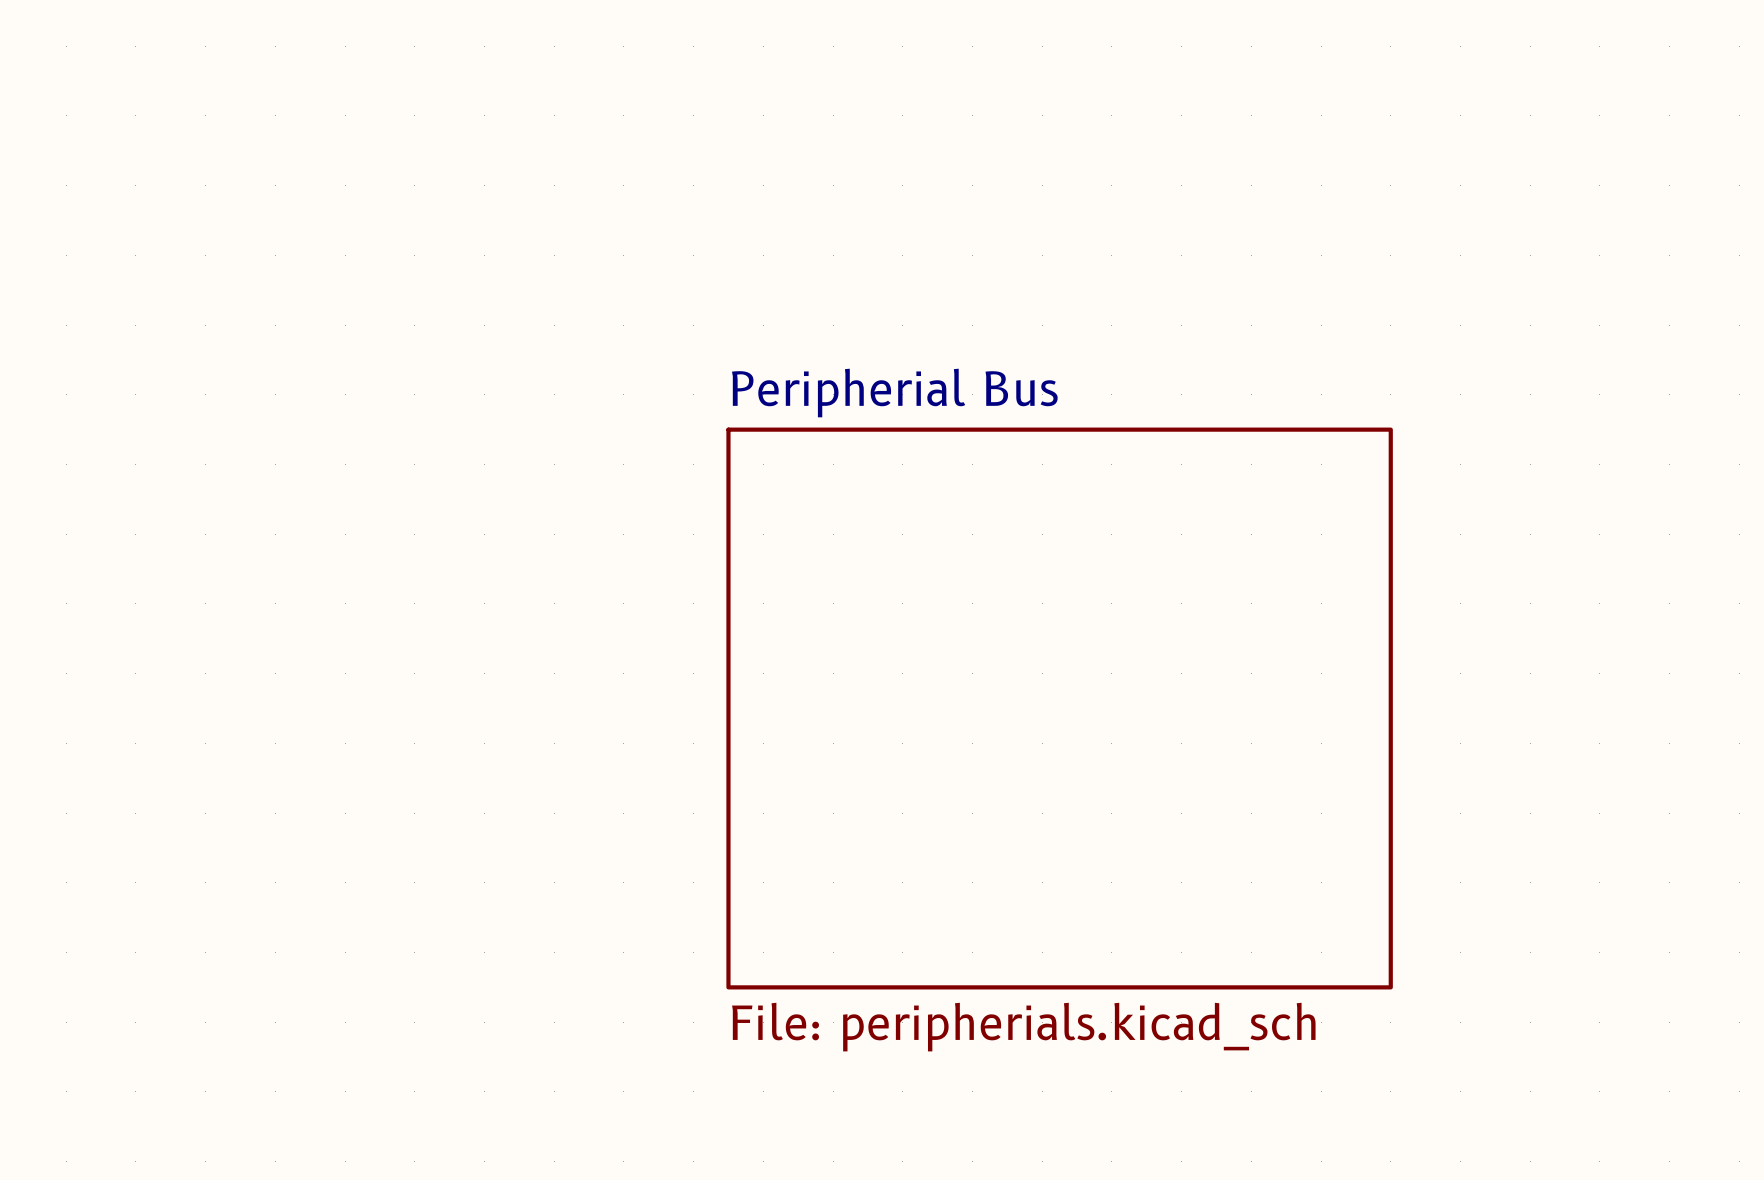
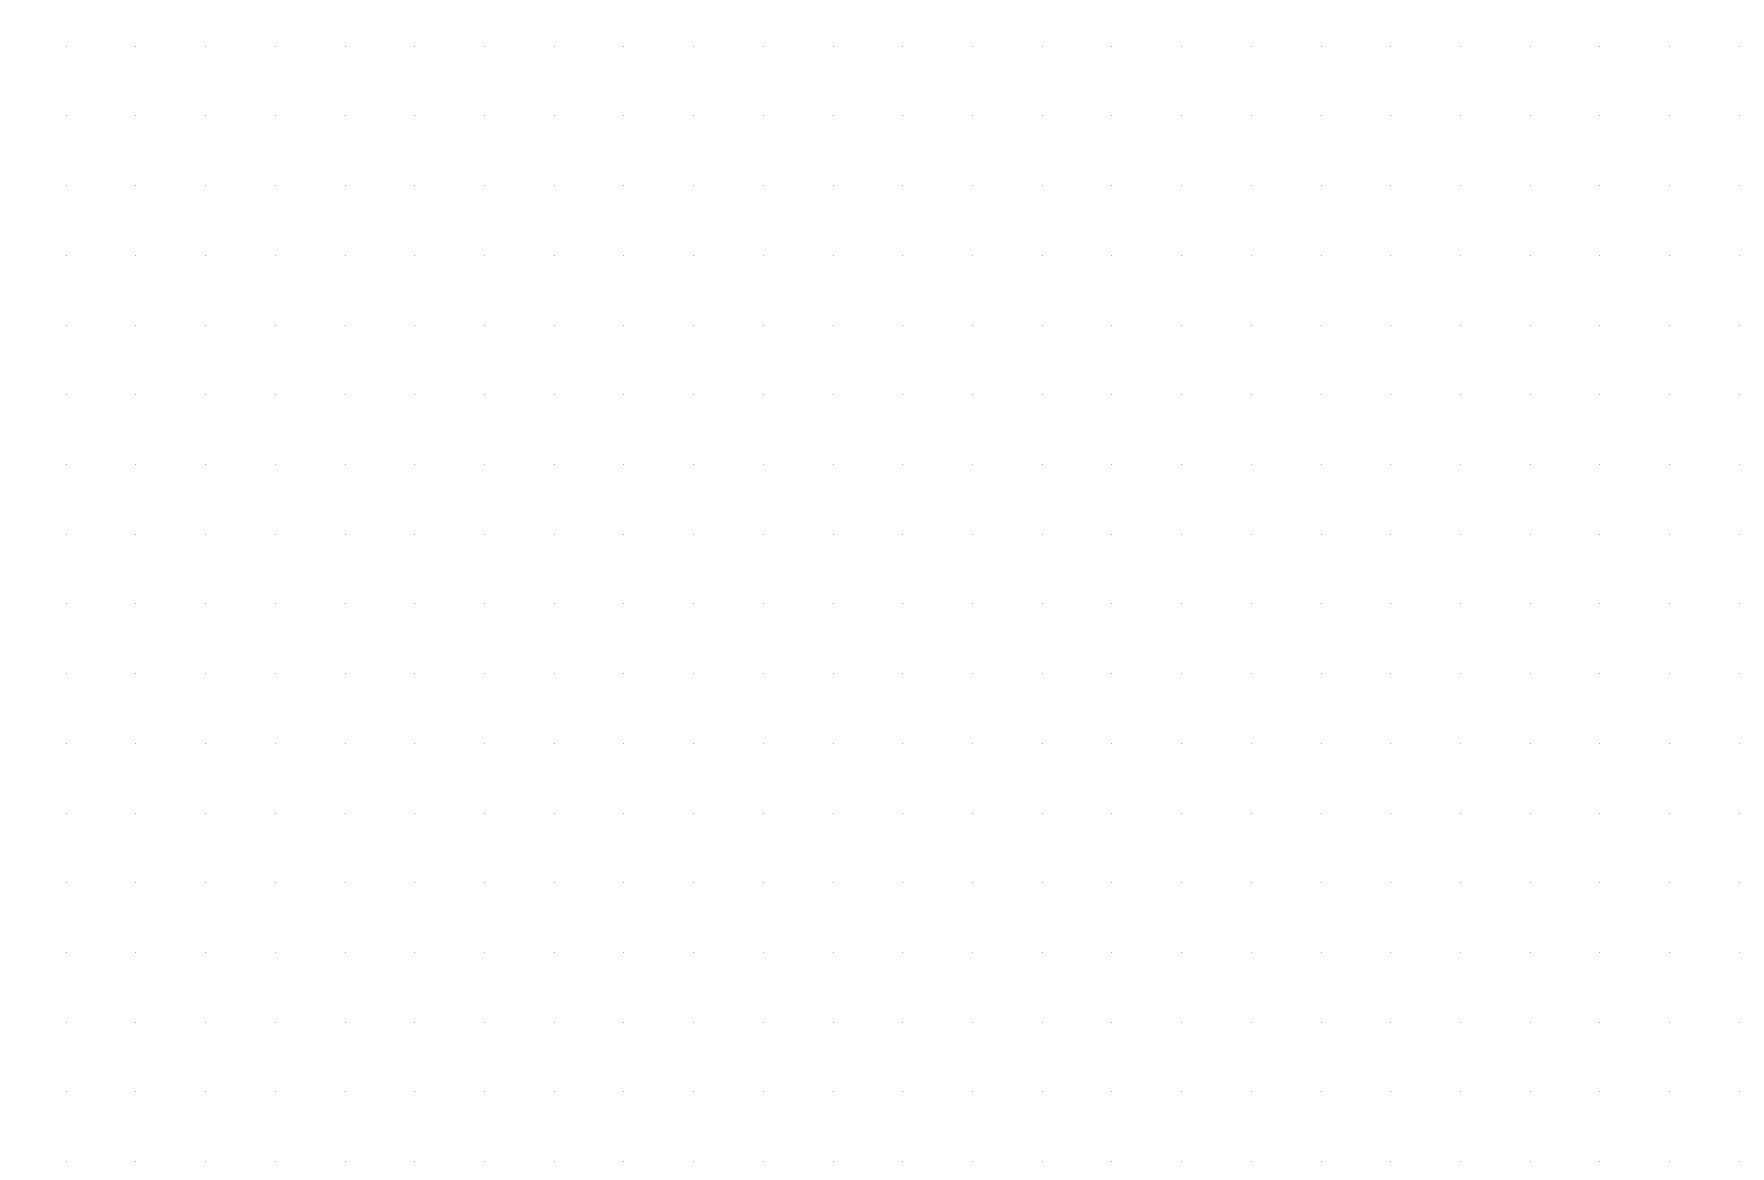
sheet Peripherial Bus: File: peripherials.kicad_sch (1059, 708) -> none

